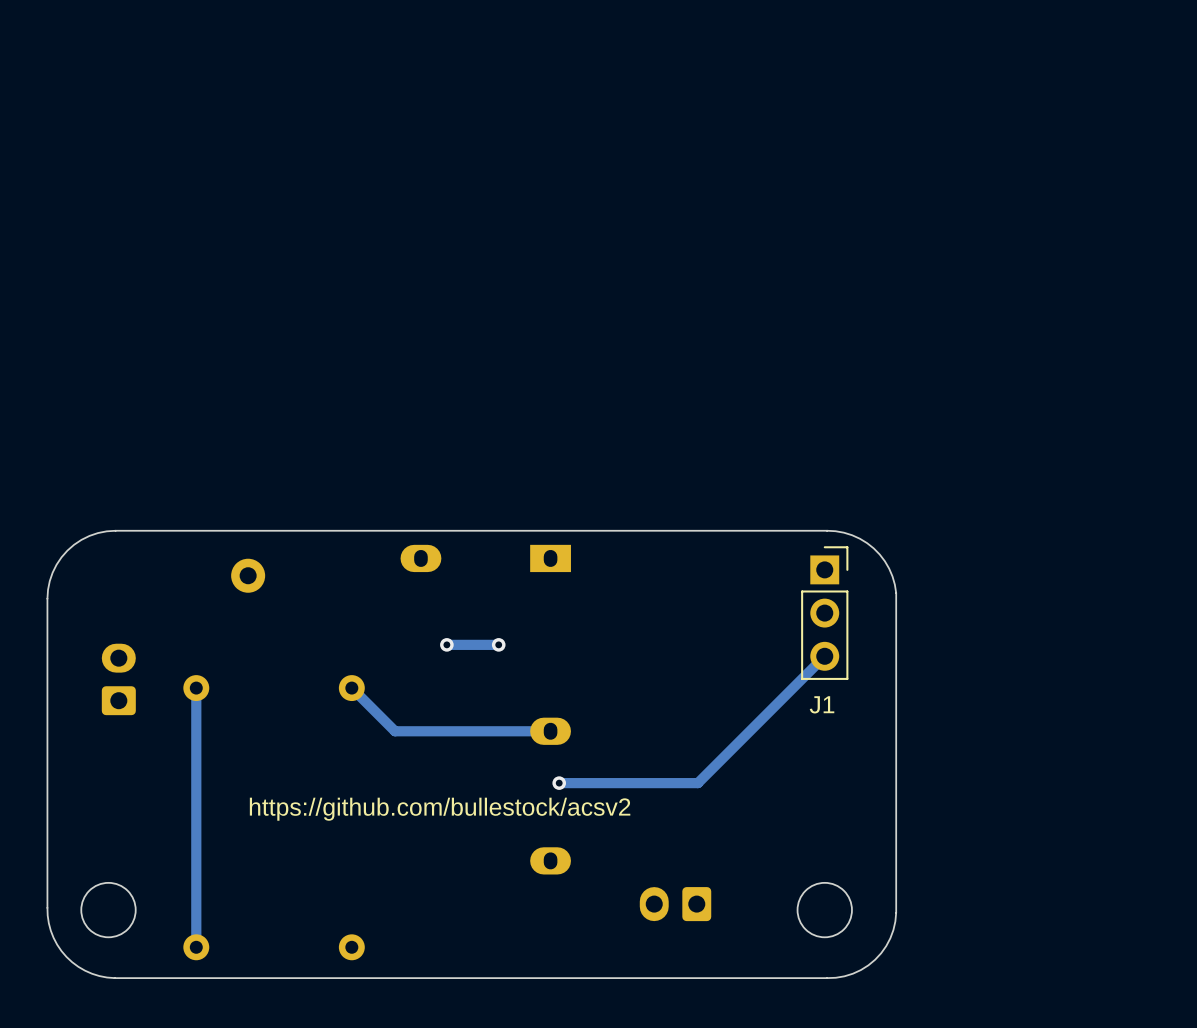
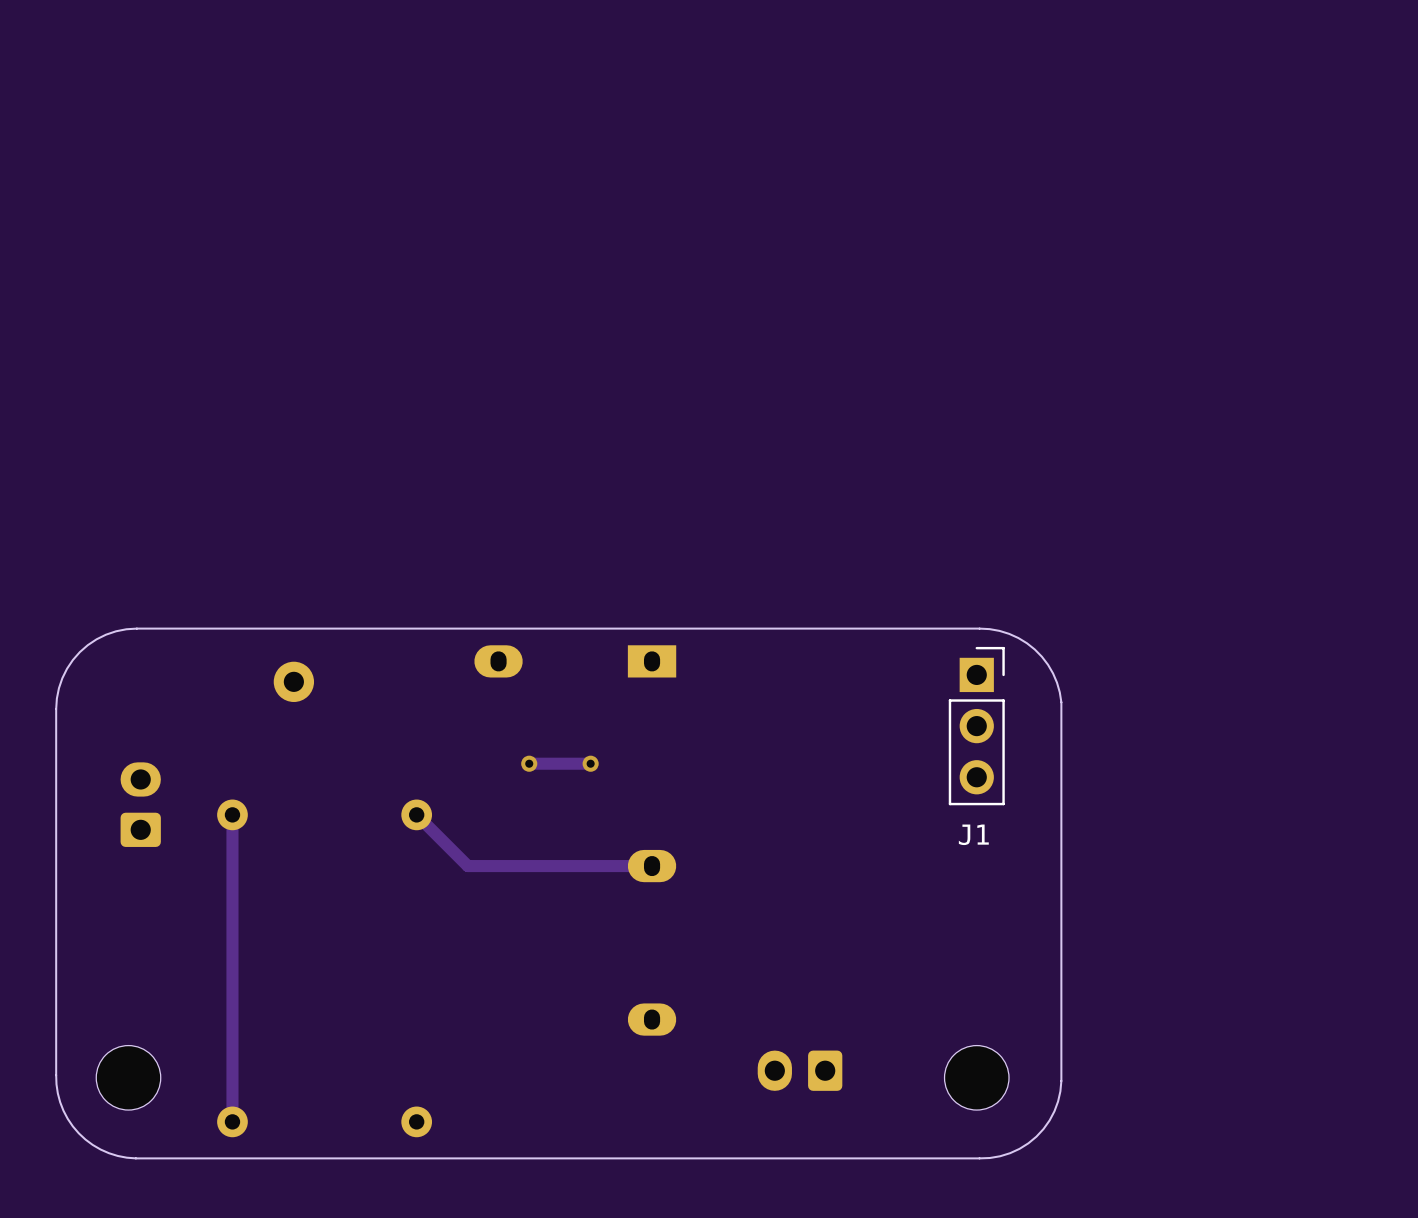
track: (824, 656) (697, 783) (559, 783) -> none
via: (559, 783) -> none
text: https://github.com/bullestock/acsv2 (440, 809) -> none

